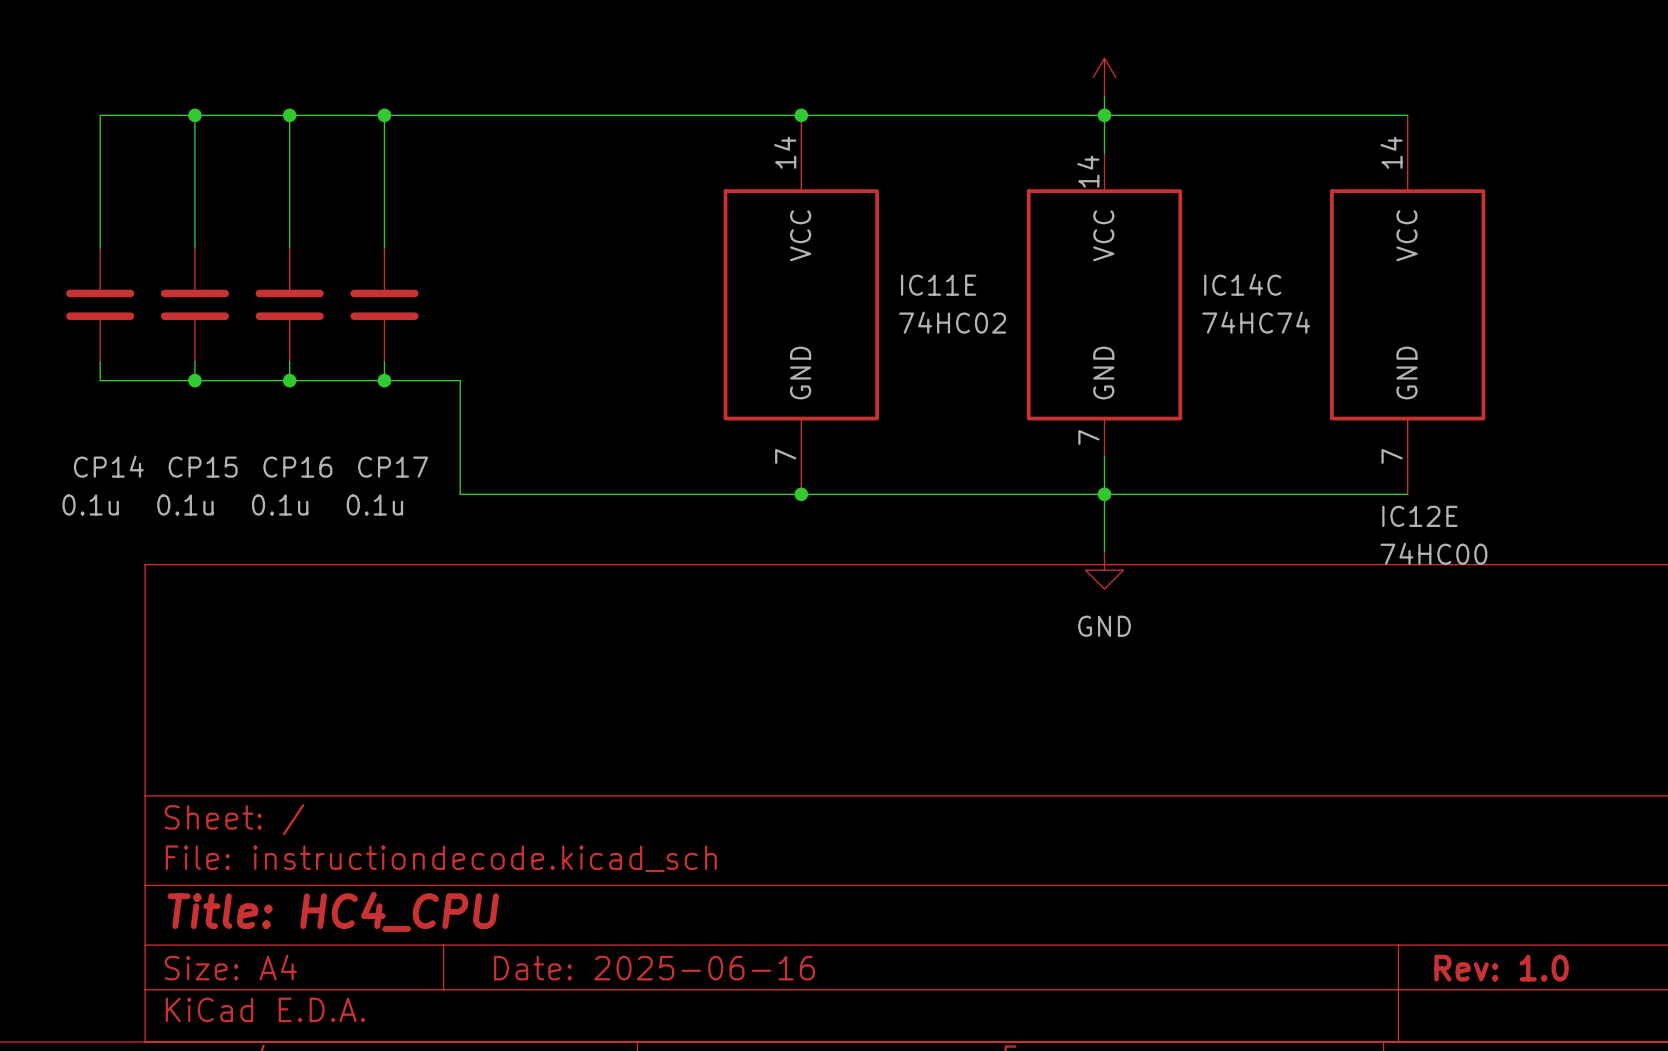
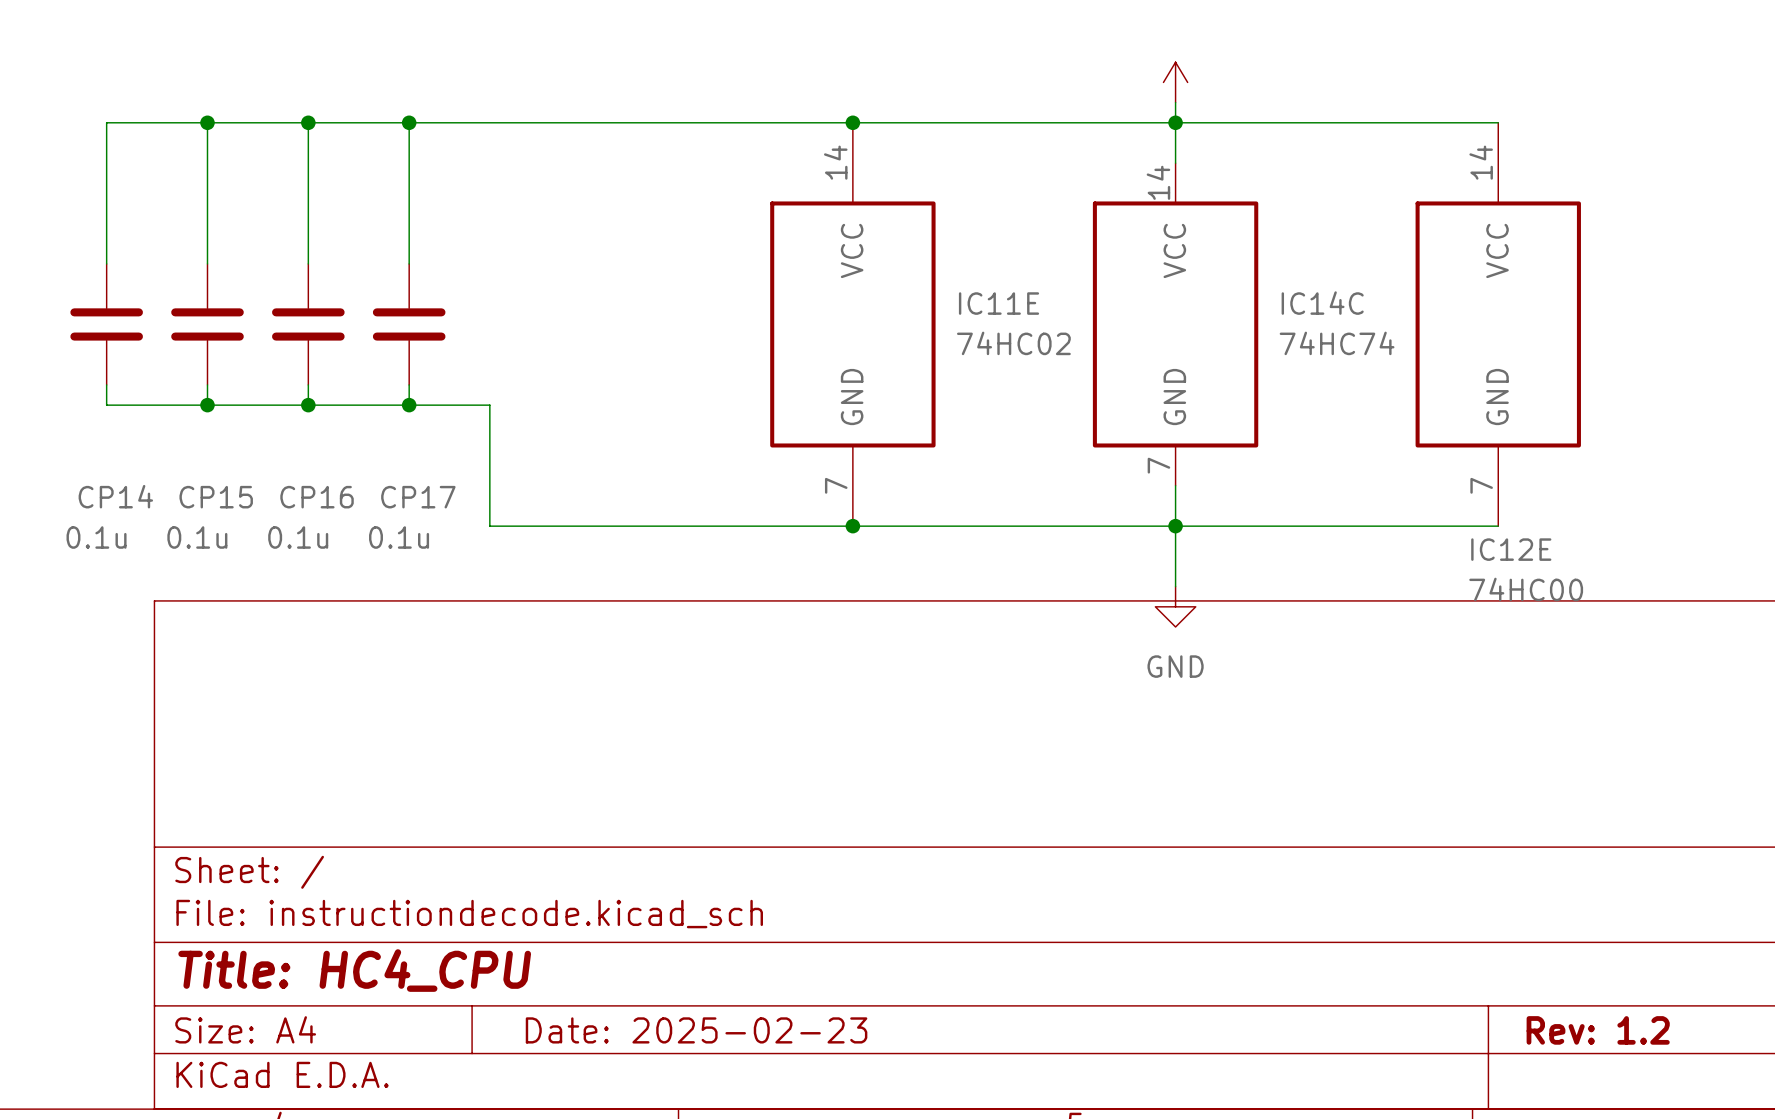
title block: Date: 2025-06-16 (654, 968) -> Date: 2025-02-23 (696, 1030)
title block: Rev: 1.0 (1501, 968) -> Rev: 1.2 (1598, 1030)

